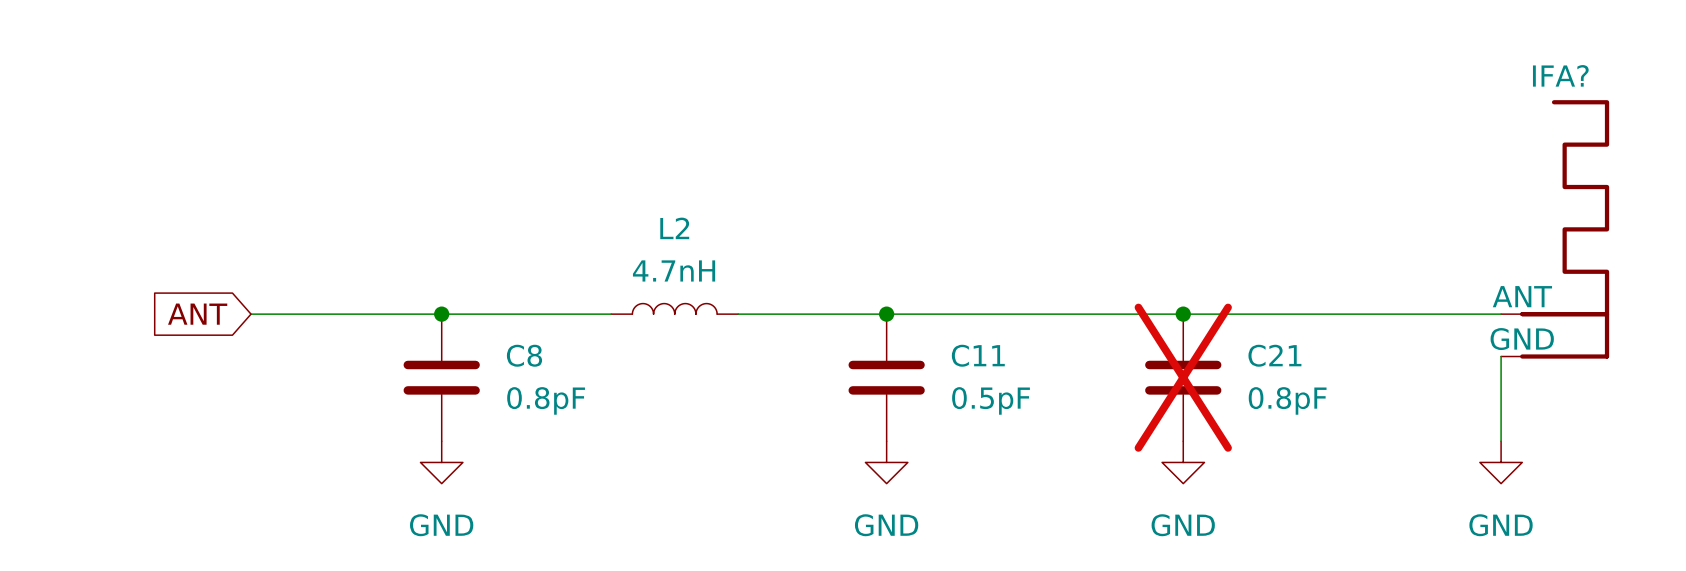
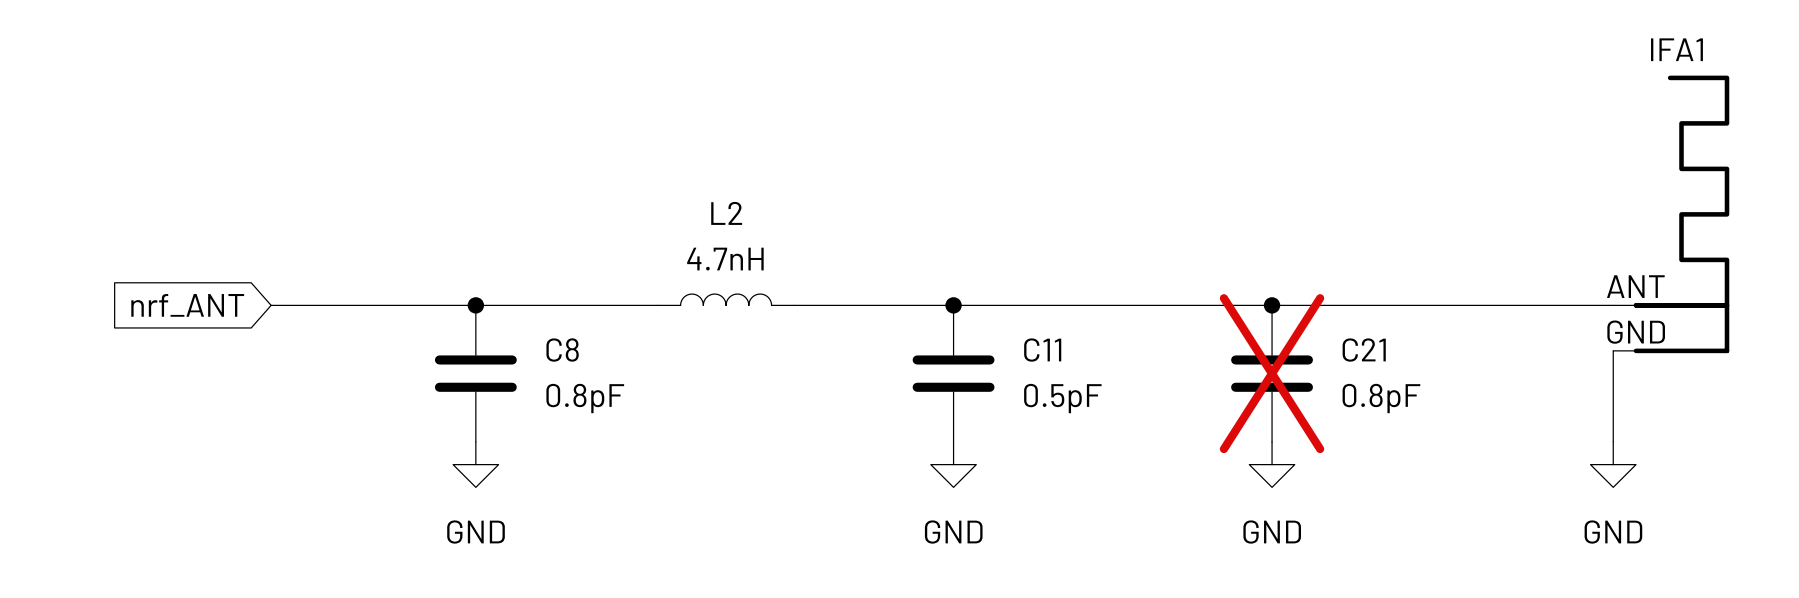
IFA? name: IFA? (1560, 75) -> IFA1 (1676, 49)
global label: ANT (197, 314) -> nrf_ANT (187, 305)

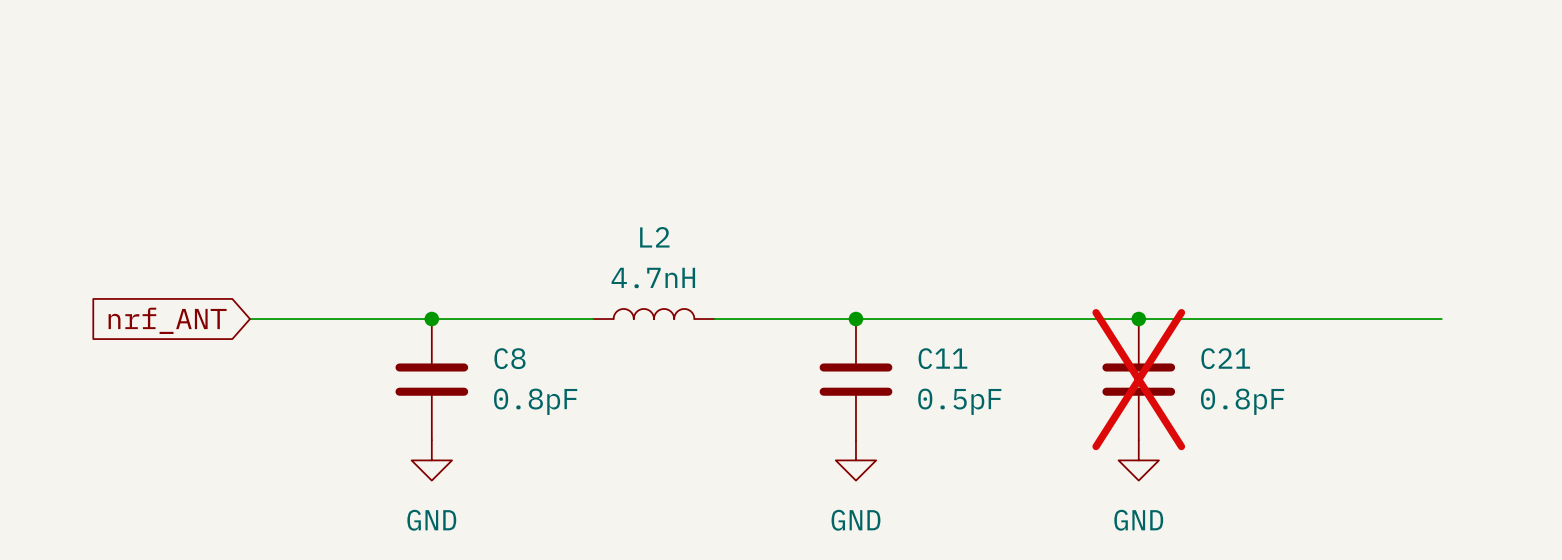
IFA1: (1671, 214) -> none
wire: (1613, 350) (1613, 441) -> none
power symbol: GND (1613, 464) -> none

